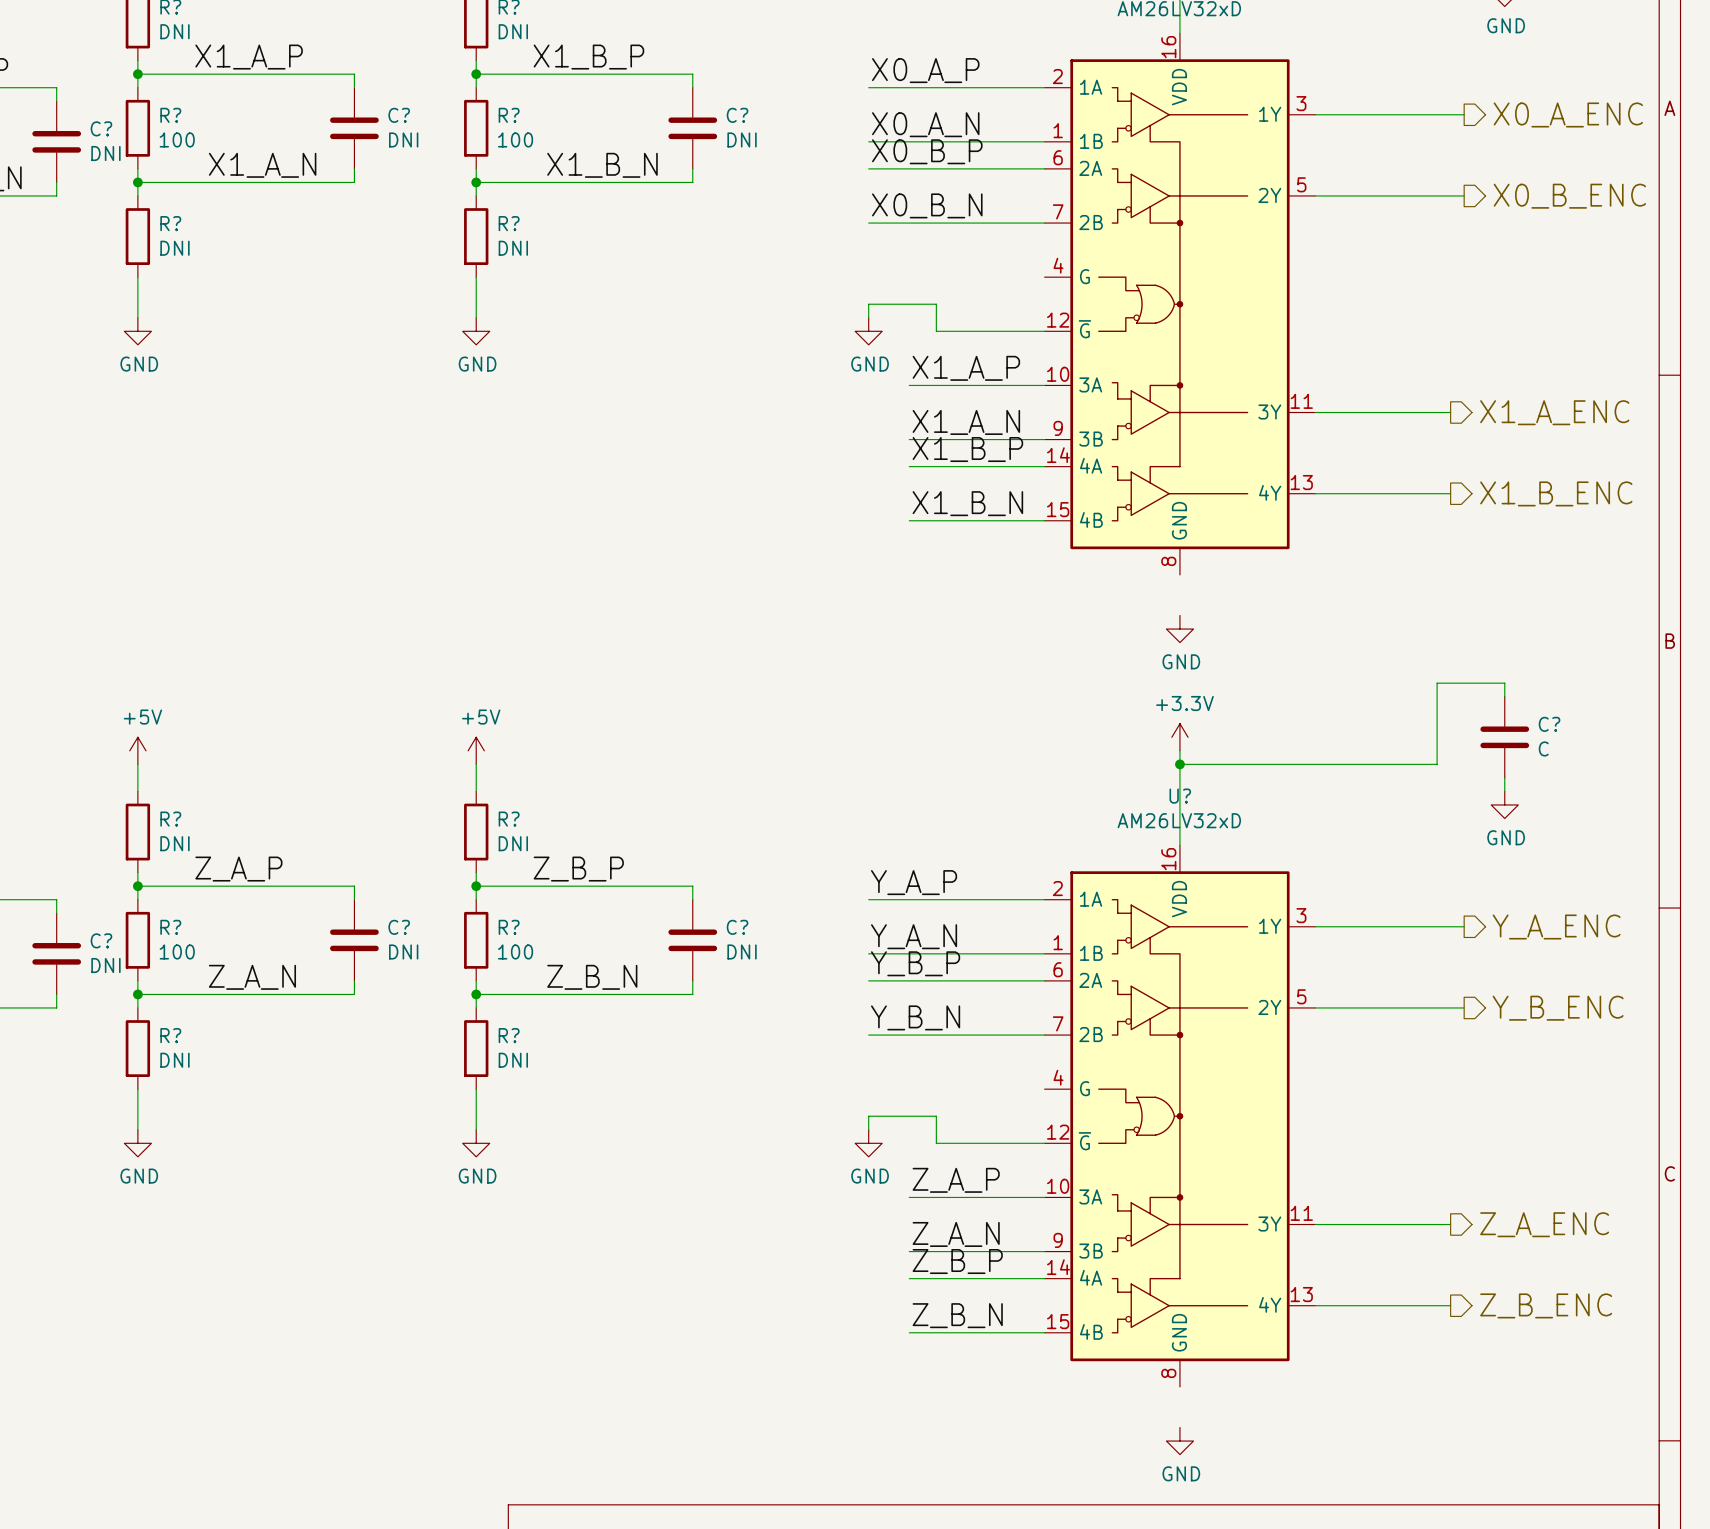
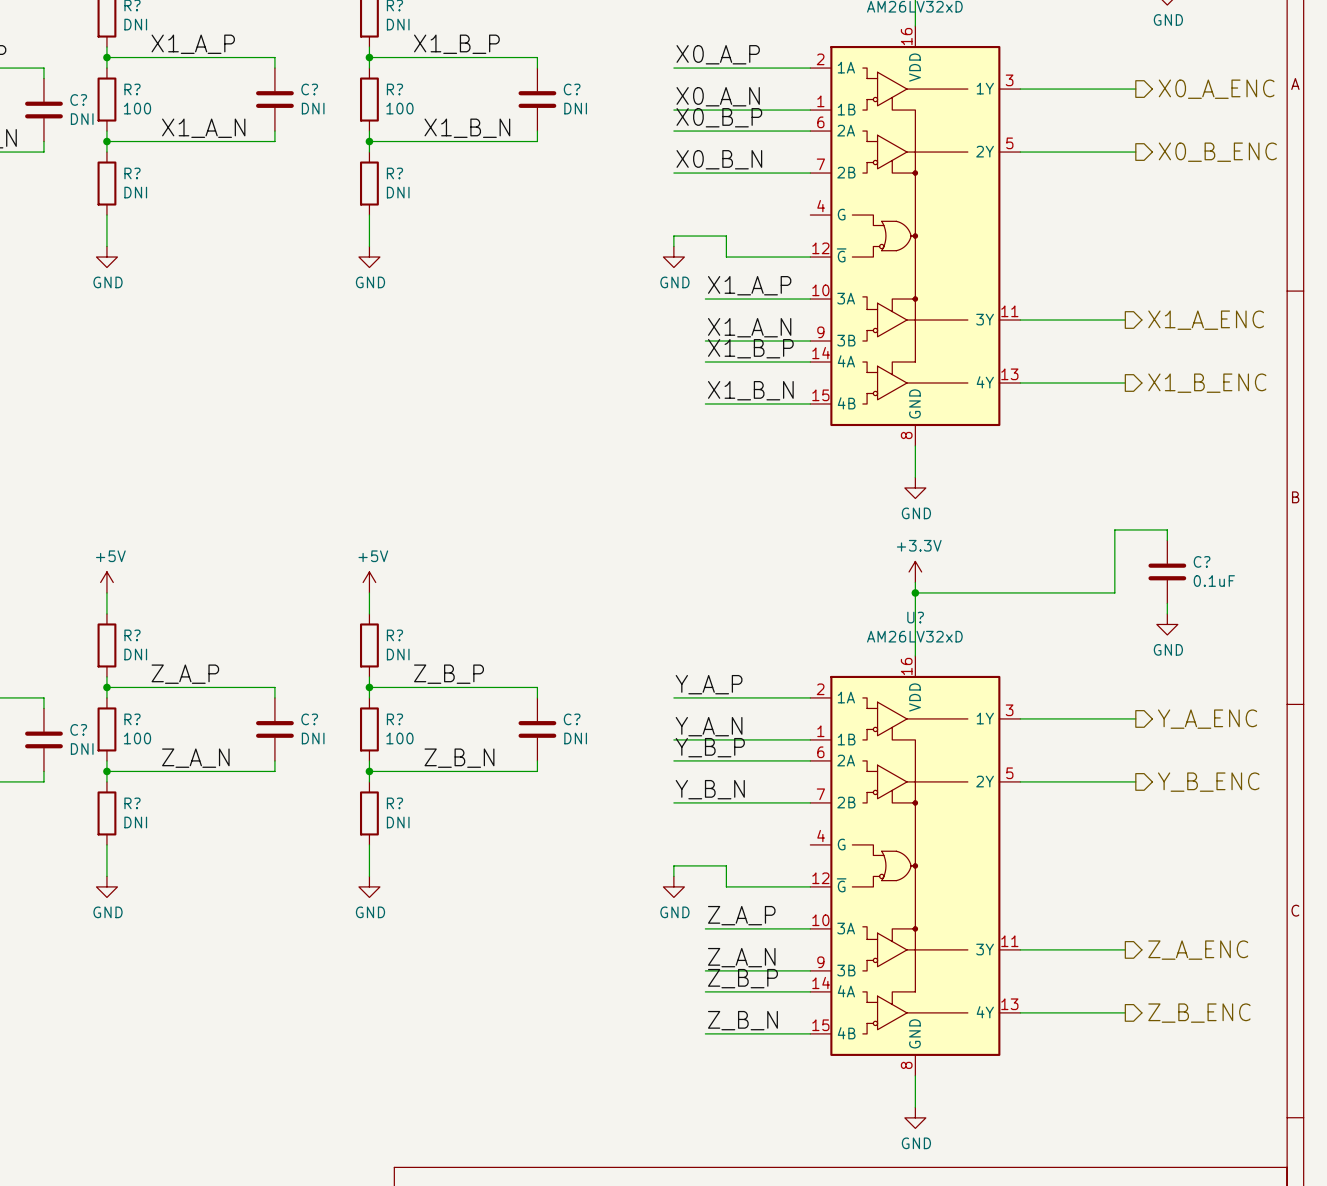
wire: none -> (915, 445) (915, 477)
C? value: C (1543, 748) -> 0.1uF (1214, 581)
wire: none -> (915, 1075) (915, 1107)

